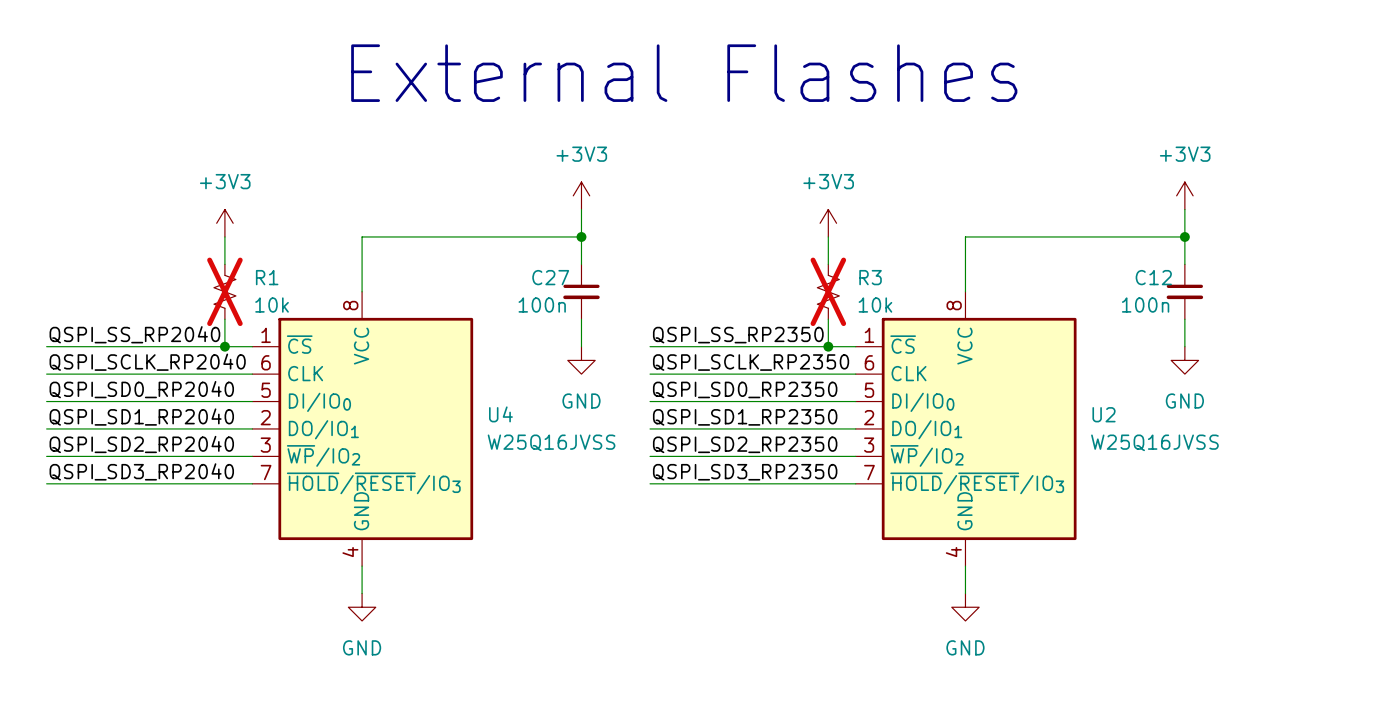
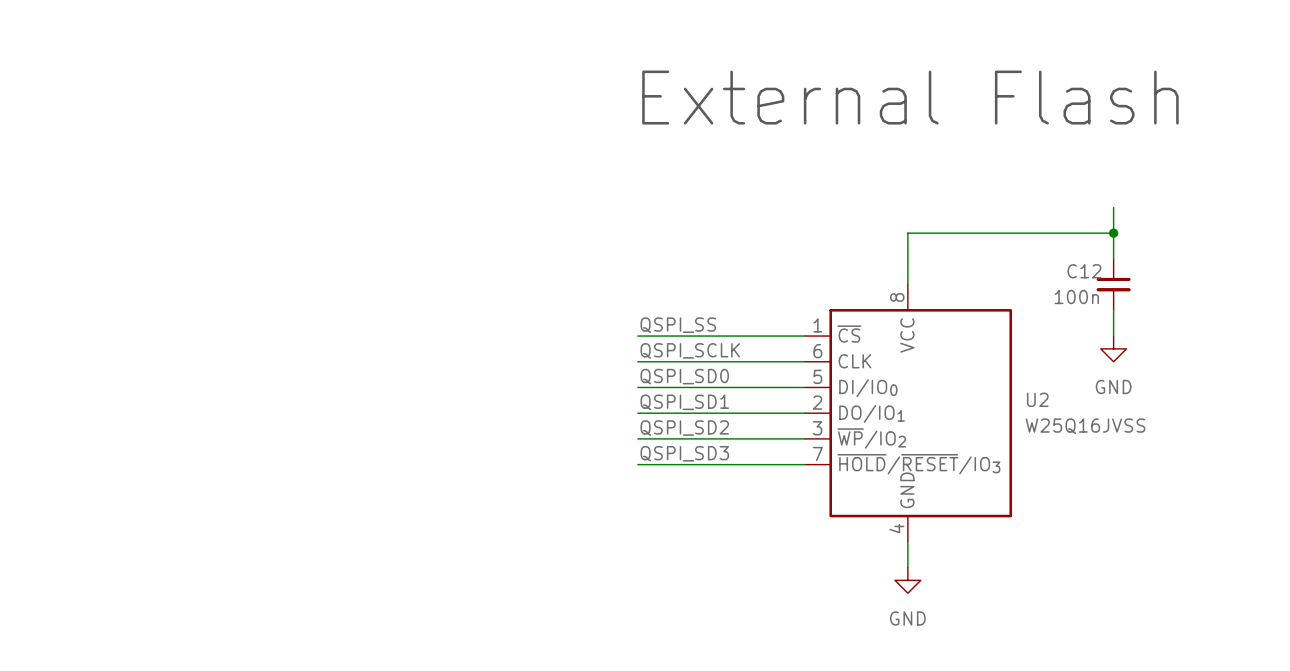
text: External Flashes (684, 73) -> none
text: none -> External Flash (910, 97)
power symbol: +3V3 (581, 195) -> none
power symbol: +3V3 (1184, 195) -> none
wire: (581, 209) (581, 264) -> none
power symbol: +3V3 (224, 223) -> none
power symbol: +3V3 (828, 223) -> none
wire: (224, 236) (224, 264) -> none
wire: (581, 236) (362, 236) (362, 291) -> none
junction: (581, 236) -> none
wire: (828, 236) (828, 264) -> none
R1: 10k (224, 291) -> none
C27: 100n (581, 291) -> none
R3: 10k (828, 291) -> none
wire: (224, 319) (224, 346) -> none
wire: (581, 319) (581, 346) -> none
wire: (828, 319) (828, 346) -> none
label: QSPI_SS_RP2040 (134, 334) -> none
label: QSPI_SS_RP2350 (738, 335) -> QSPI_SS (678, 325)
wire: (46, 346) (252, 346) -> none
junction: (224, 346) -> none
wire: (650, 346) (677, 346) -> none
junction: (828, 346) -> none
power symbol: GND (581, 360) -> none
label: QSPI_SCLK_RP2040 (147, 362) -> none
label: QSPI_SCLK_RP2350 (751, 362) -> QSPI_SCLK (690, 350)
wire: (46, 374) (252, 374) -> none
wire: (650, 374) (677, 374) -> none
label: QSPI_SD0_RP2040 (141, 389) -> none
label: none -> QSPI_SD0 (684, 376)
label: QSPI_SD0_RP2350 (745, 389) -> none
wire: (46, 401) (252, 401) -> none
wire: (650, 401) (677, 401) -> none
label: QSPI_SD1_RP2040 (141, 417) -> none
label: none -> QSPI_SD1 (684, 402)
label: QSPI_SD1_RP2350 (745, 417) -> none
wire: (46, 428) (252, 428) -> none
U4: W25Q16JVSS (362, 428) -> none
wire: (650, 428) (677, 428) -> none
label: QSPI_SD2_RP2040 (141, 444) -> none
label: none -> QSPI_SD2 (684, 428)
label: QSPI_SD2_RP2350 (745, 444) -> none
wire: (46, 456) (252, 456) -> none
wire: (650, 456) (677, 456) -> none
label: QSPI_SD3_RP2040 (141, 471) -> none
label: none -> QSPI_SD3 (684, 453)
label: QSPI_SD3_RP2350 (745, 472) -> none
wire: (46, 483) (252, 483) -> none
wire: (650, 483) (677, 483) -> none
wire: (362, 566) (362, 593) -> none
power symbol: GND (362, 607) -> none

